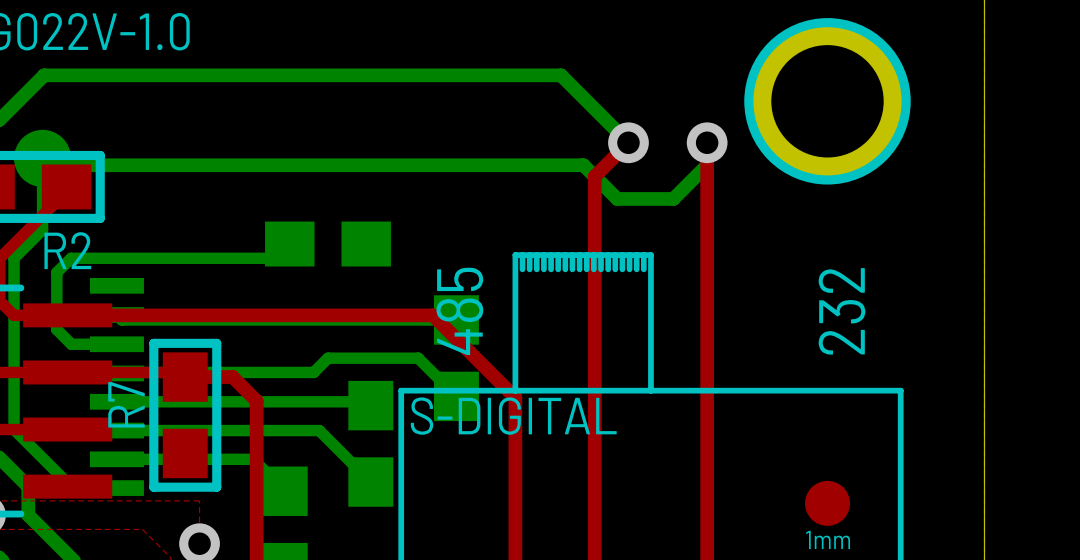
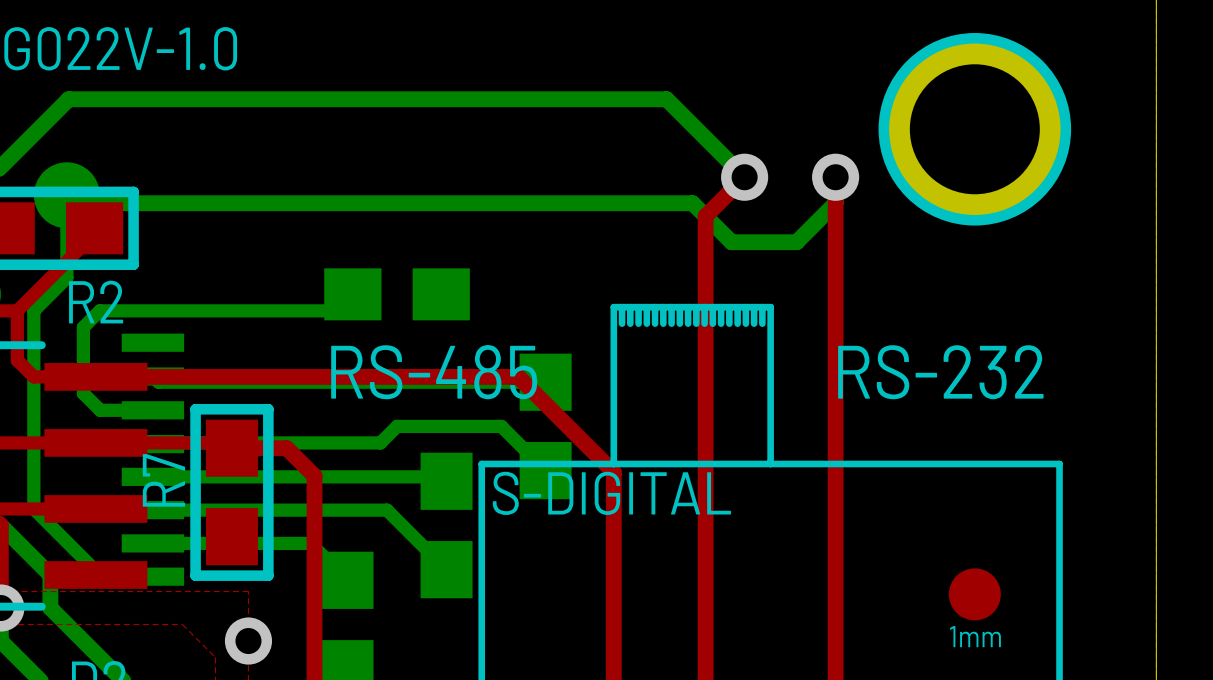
text: 485 (459, 311) -> RS-485 (434, 372)
text: 232 (841, 311) -> RS-232 (940, 372)

